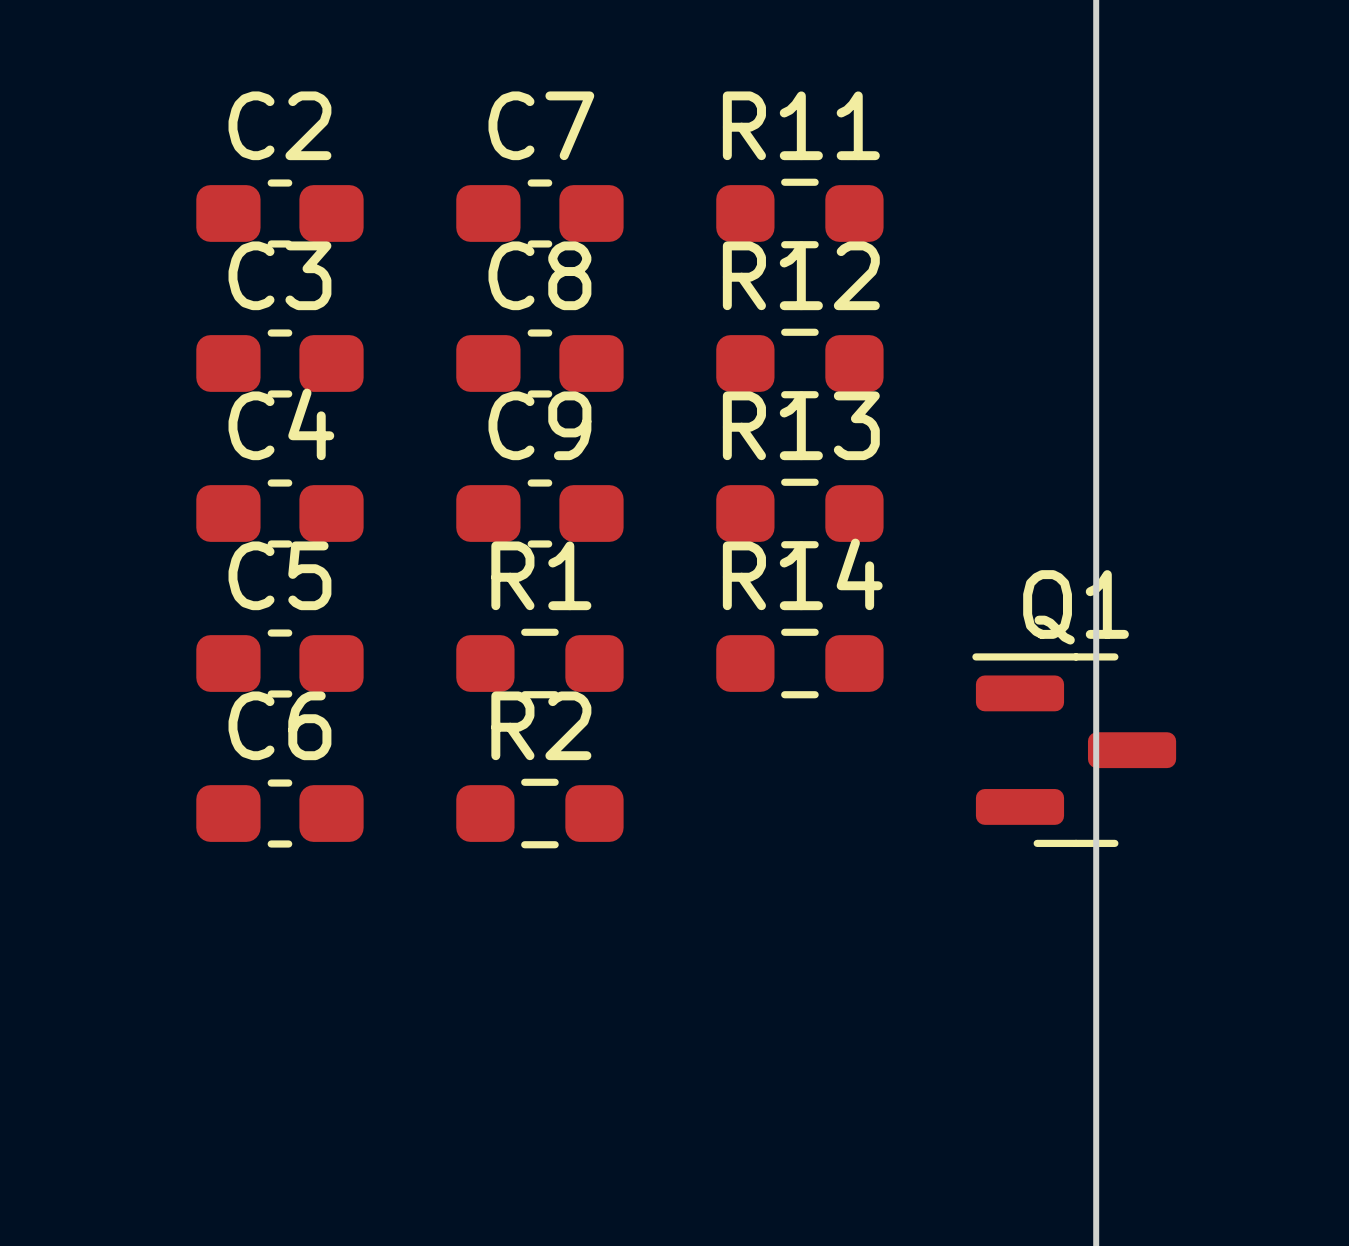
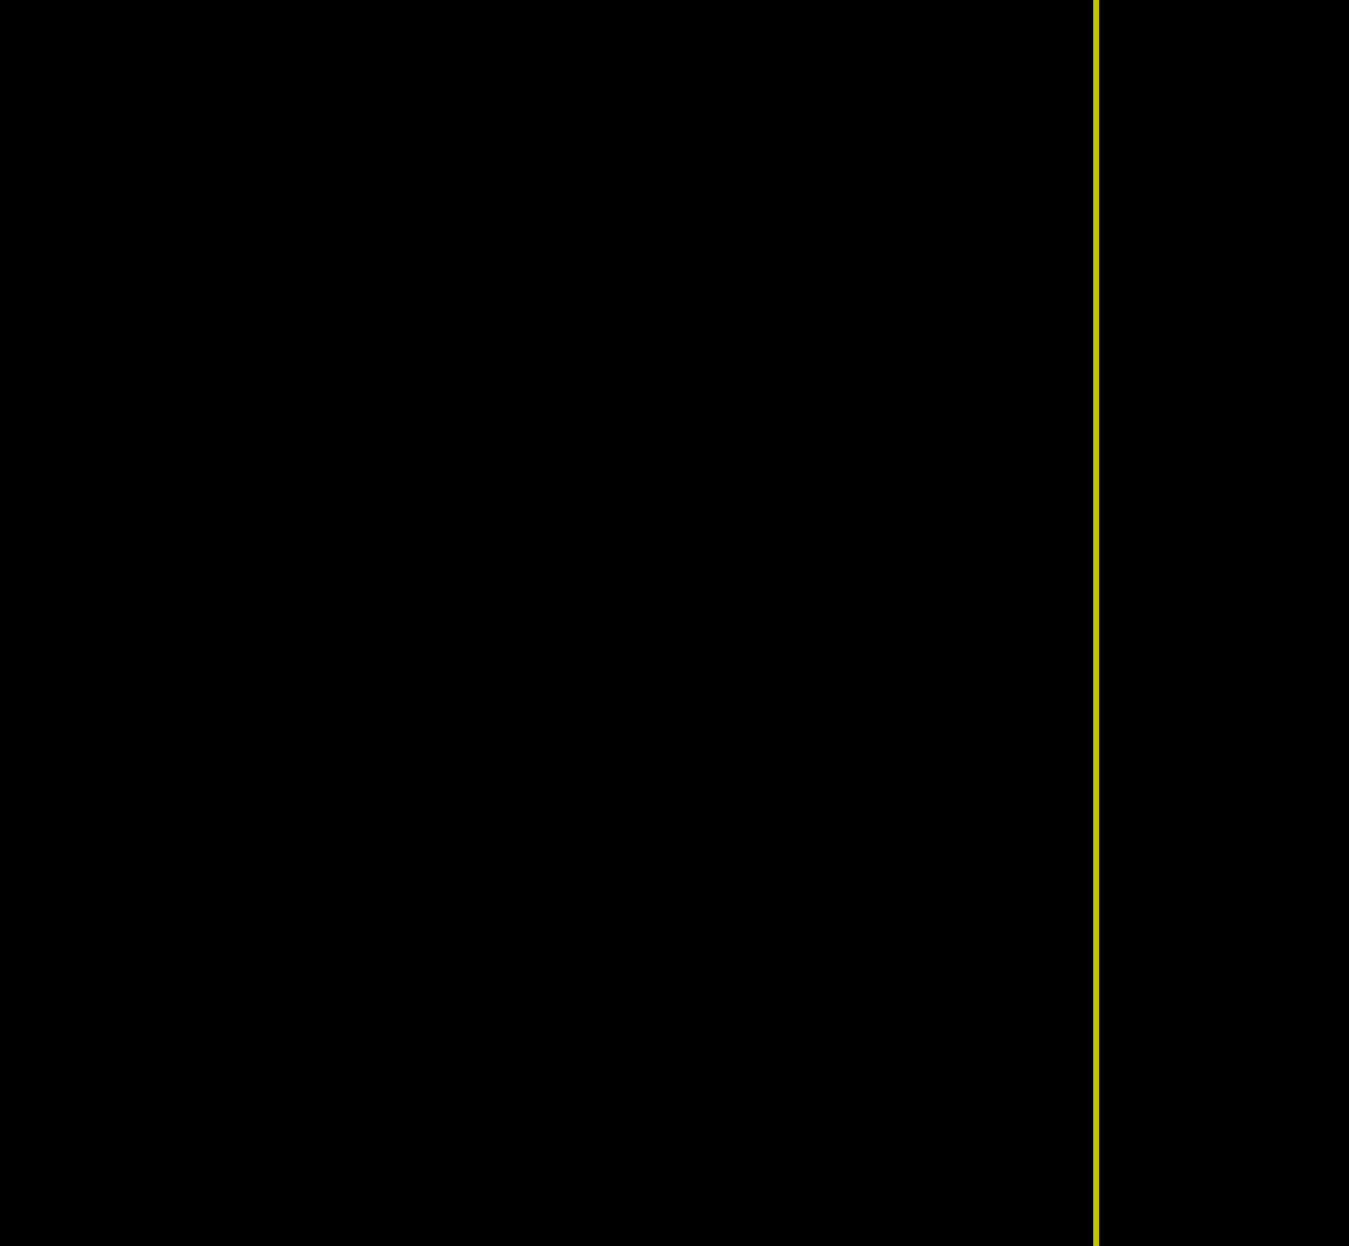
C2: (279, 213) -> none
C7: (539, 213) -> none
R11: (799, 213) -> none
C3: (279, 363) -> none
C8: (539, 363) -> none
R12: (799, 363) -> none
C4: (279, 513) -> none
C9: (539, 513) -> none
R13: (799, 513) -> none
C5: (279, 663) -> none
R1: (539, 663) -> none
R14: (799, 663) -> none
Q1: (1074, 750) -> none
C6: (279, 813) -> none
R2: (539, 813) -> none

